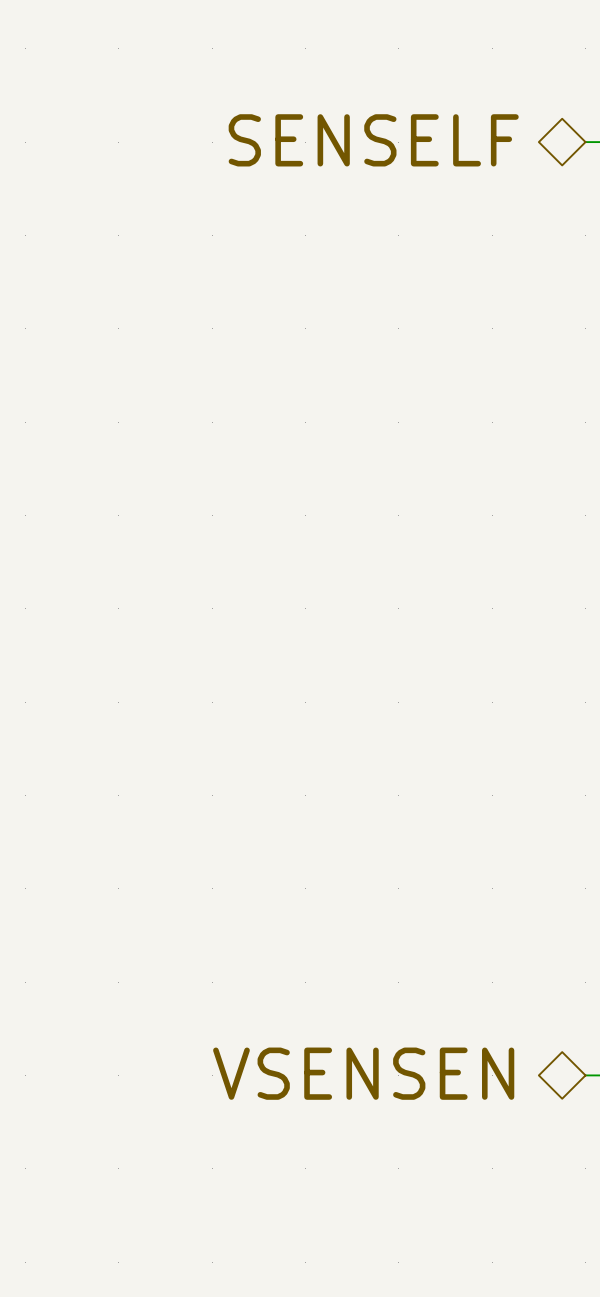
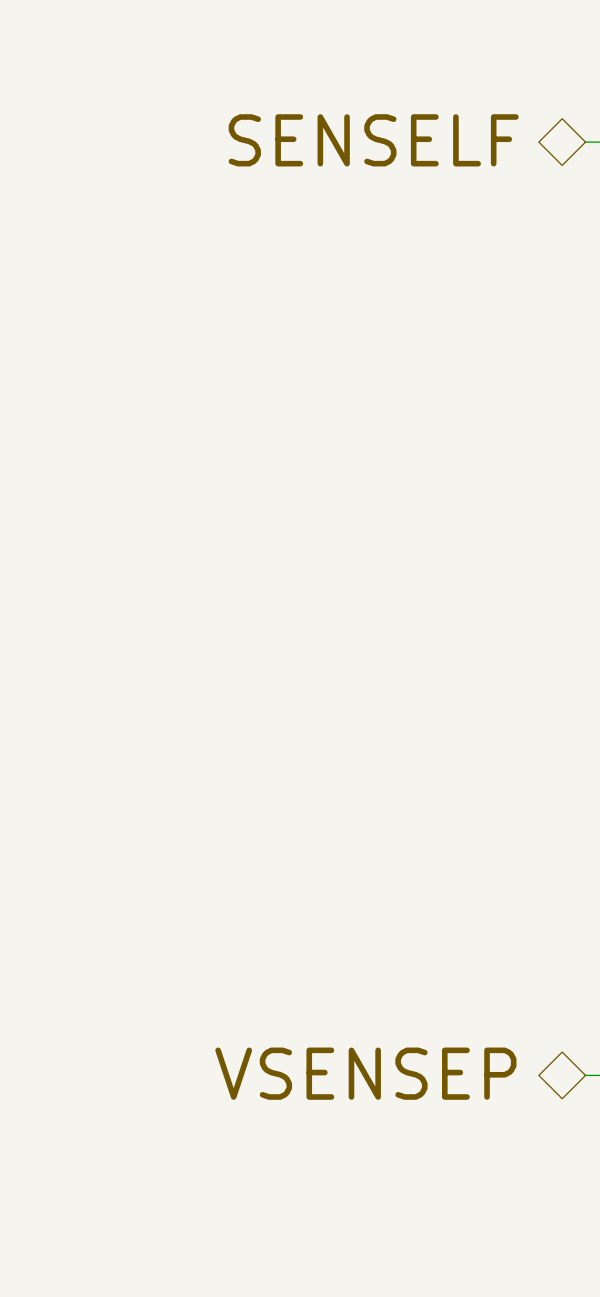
hierarchical label: VSENSEN (363, 1073) -> VSENSEP (365, 1073)

